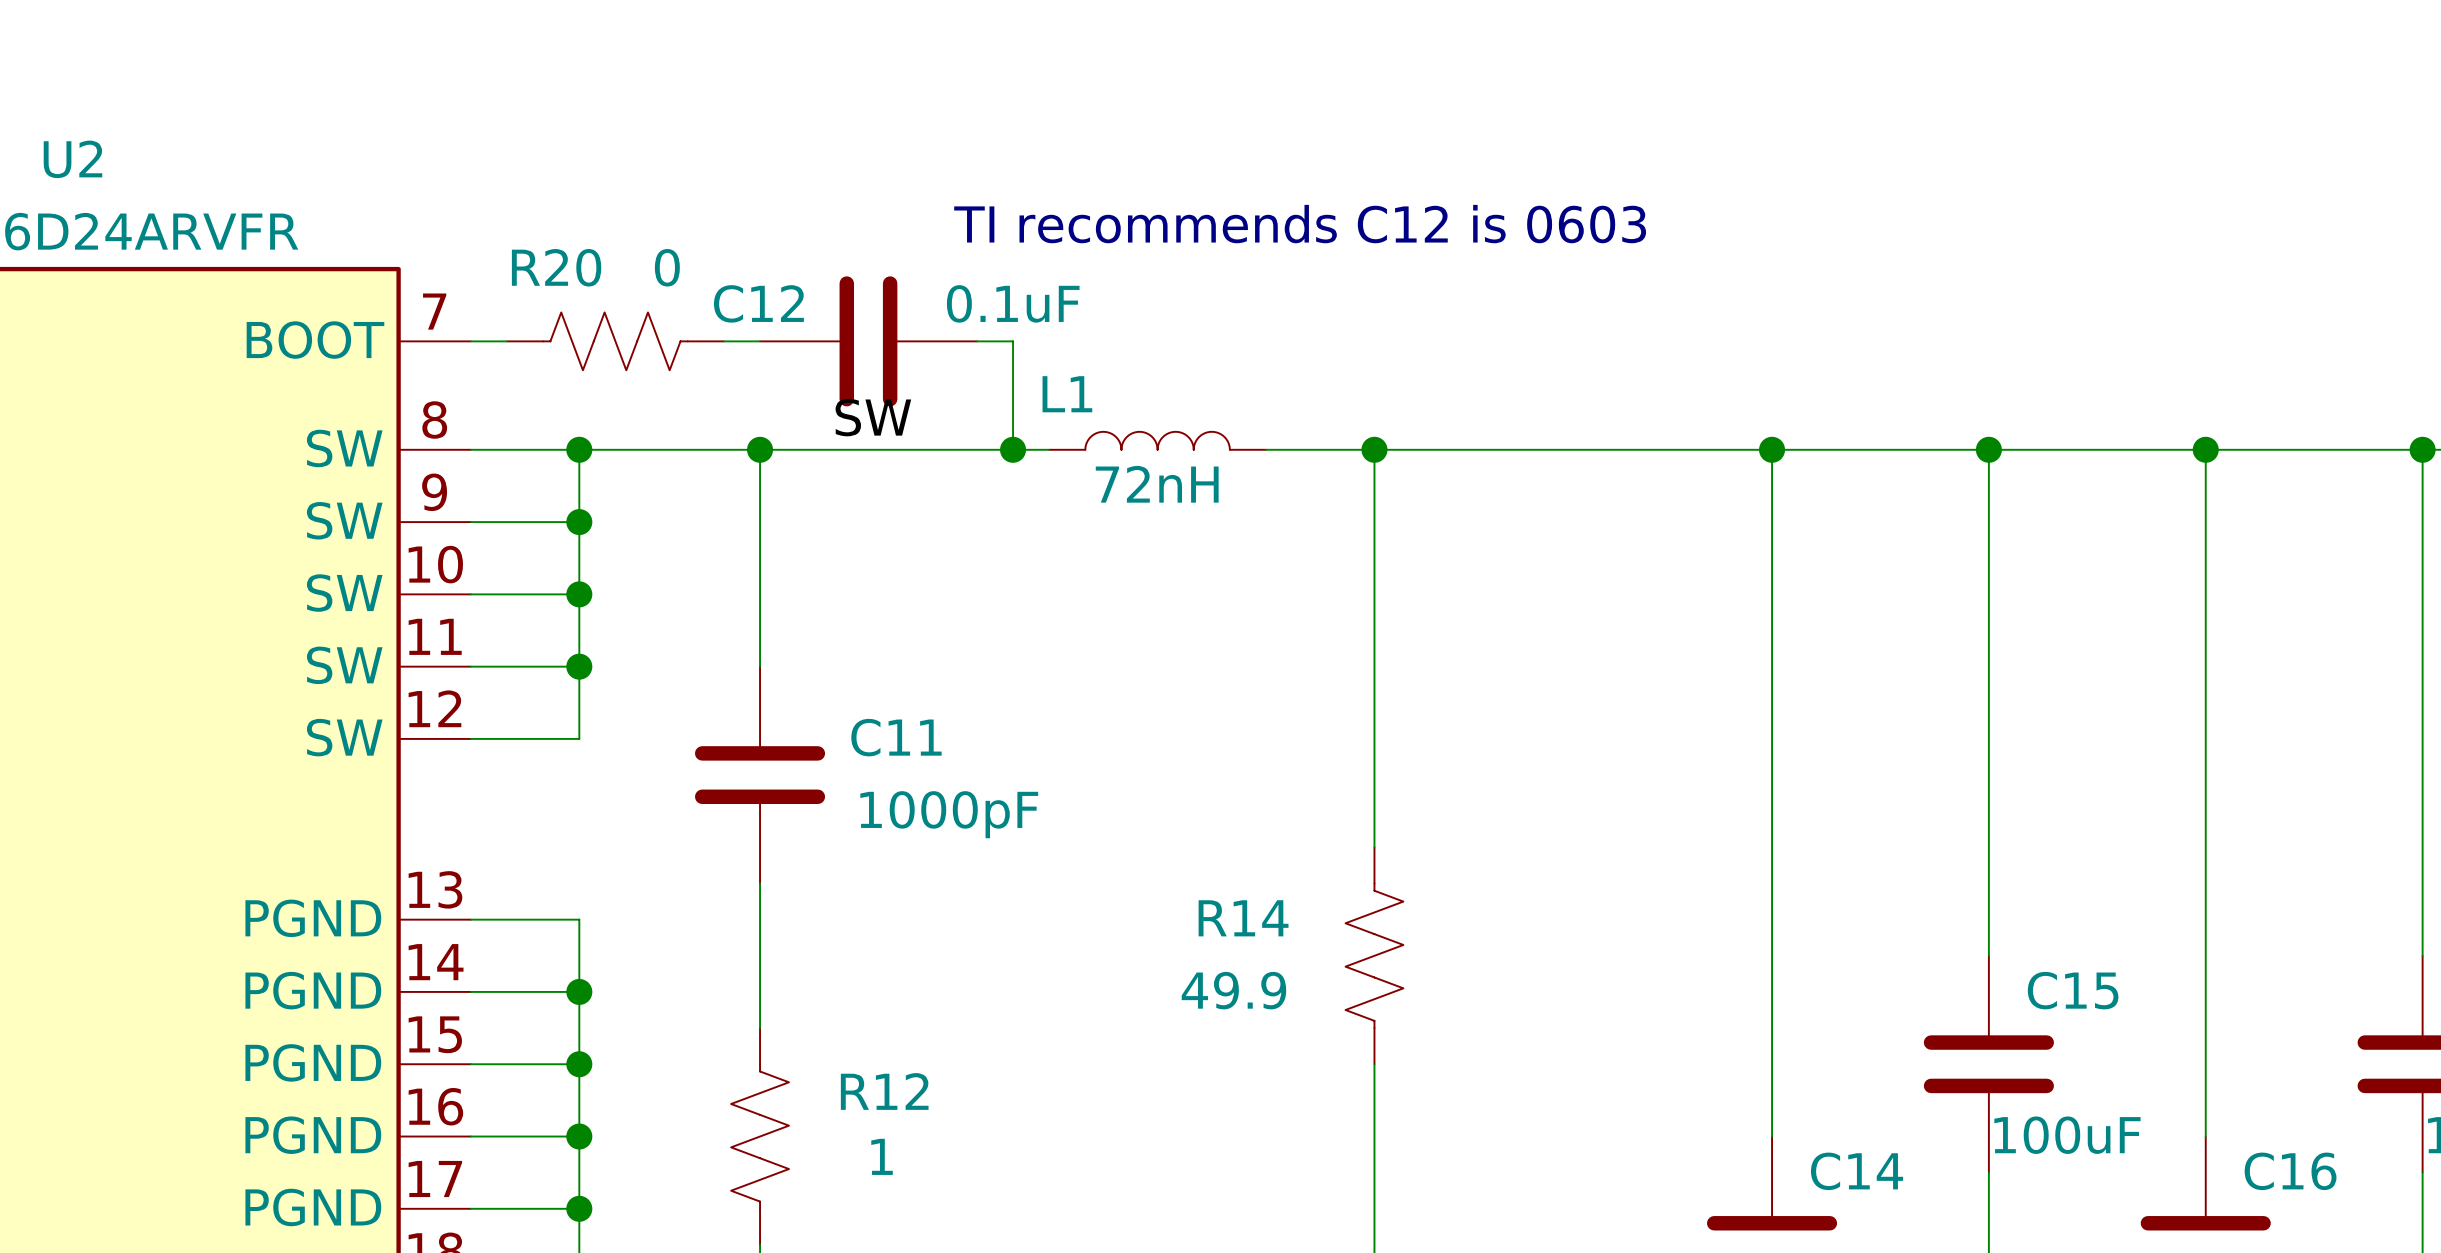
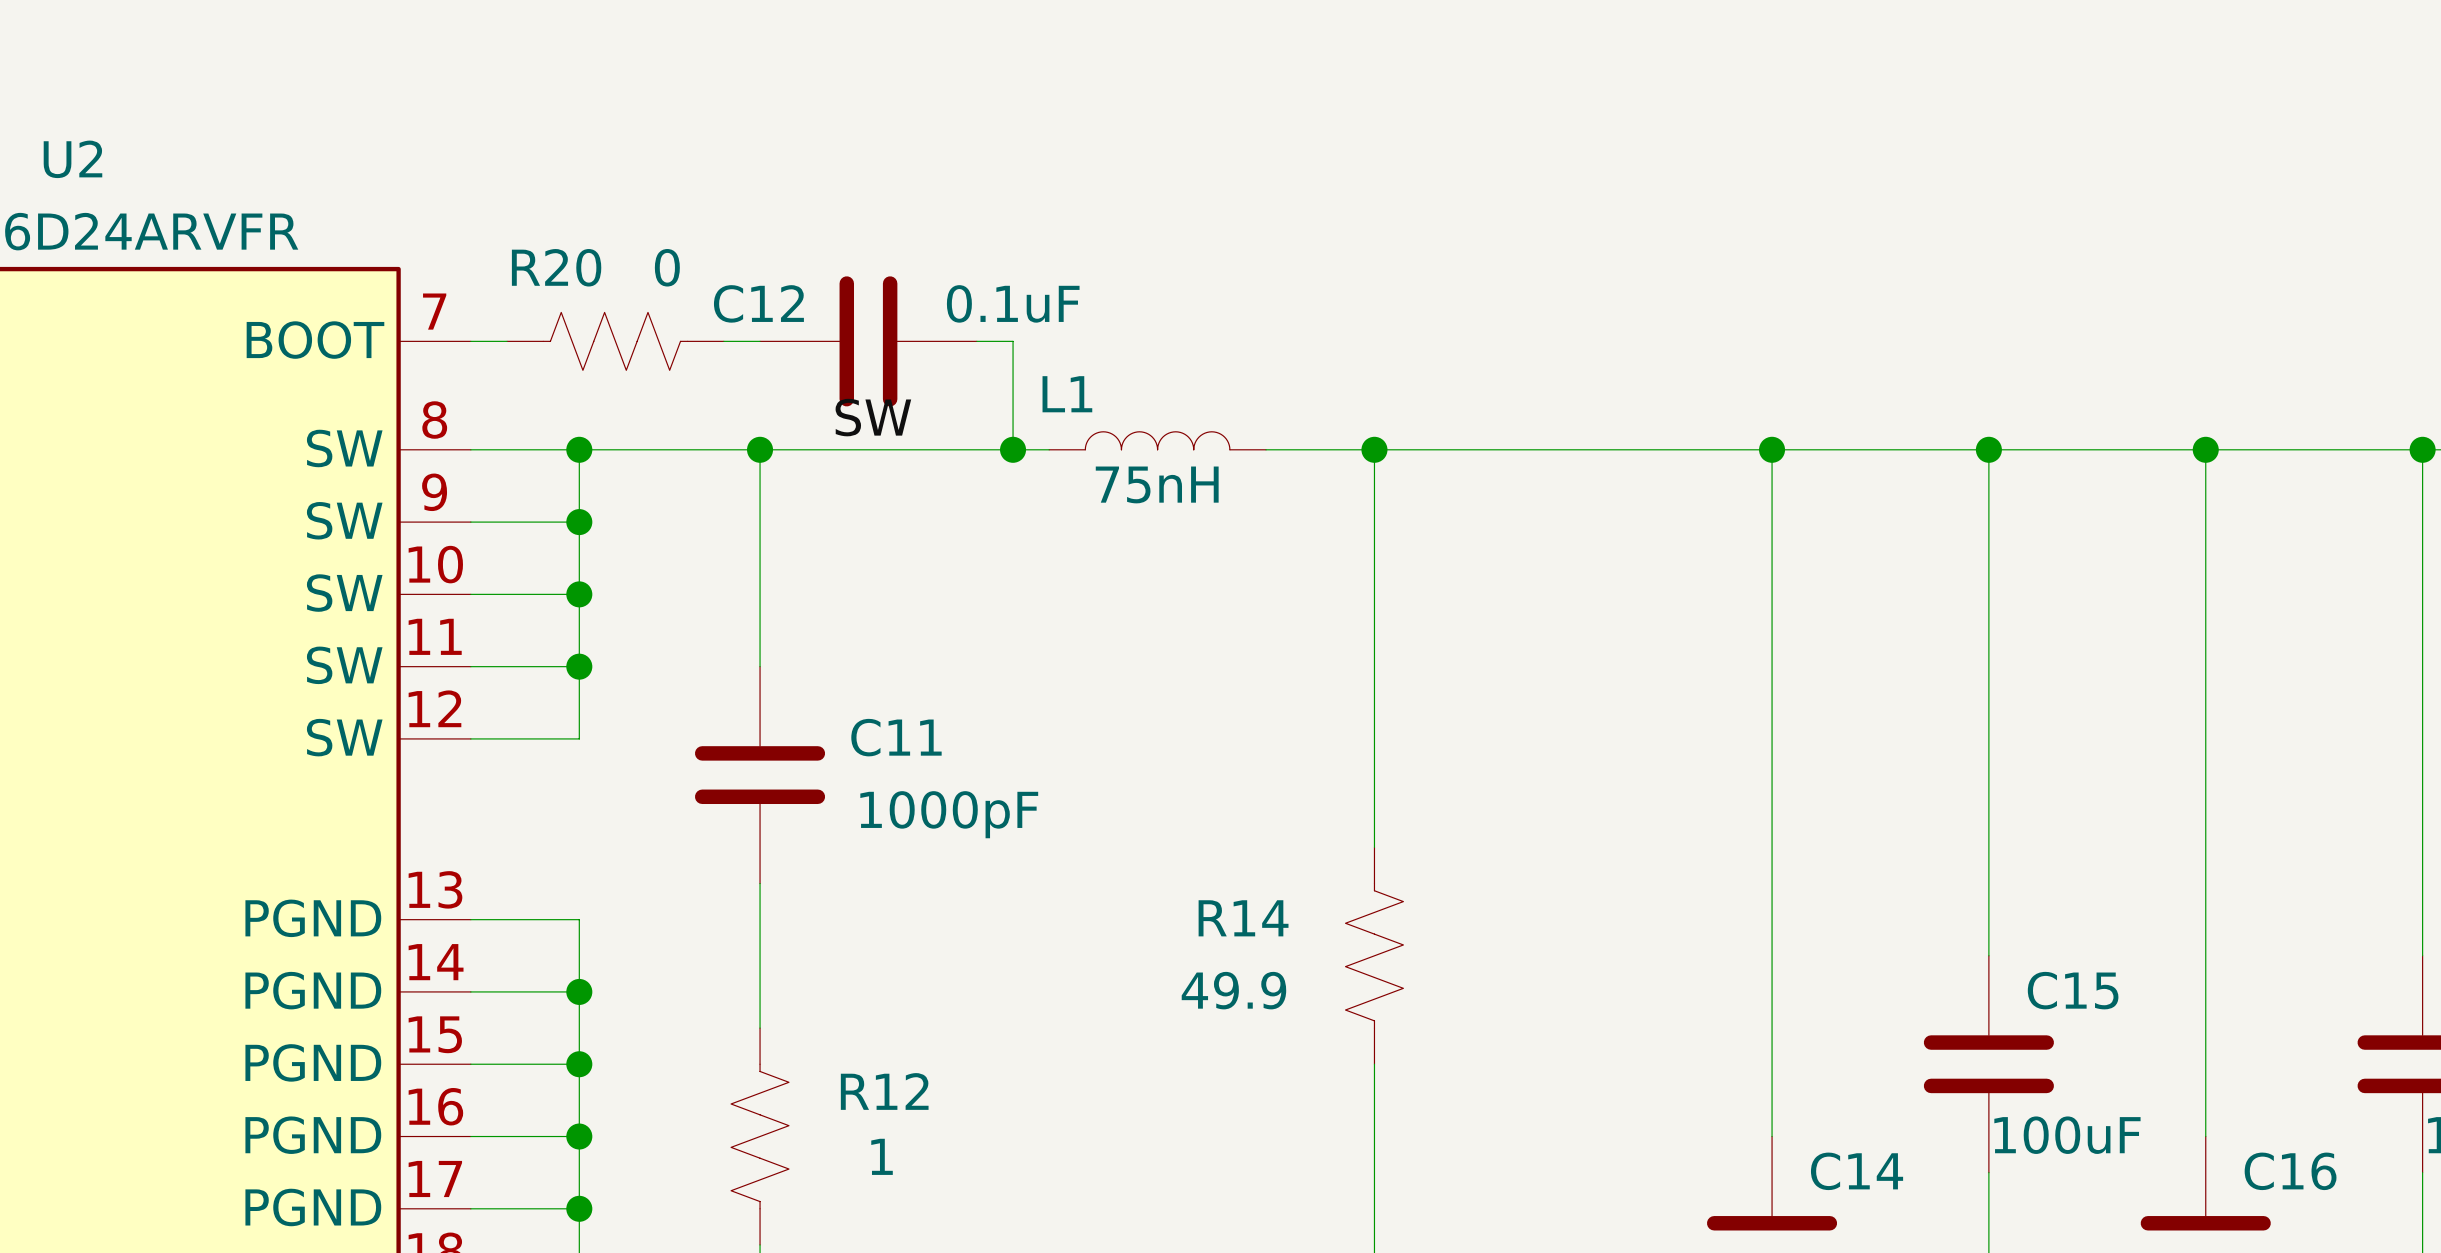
text: TI recommends C12 is 0603 (1300, 224) -> none
L1 value: 72nH (1157, 484) -> 75nH (1157, 484)

